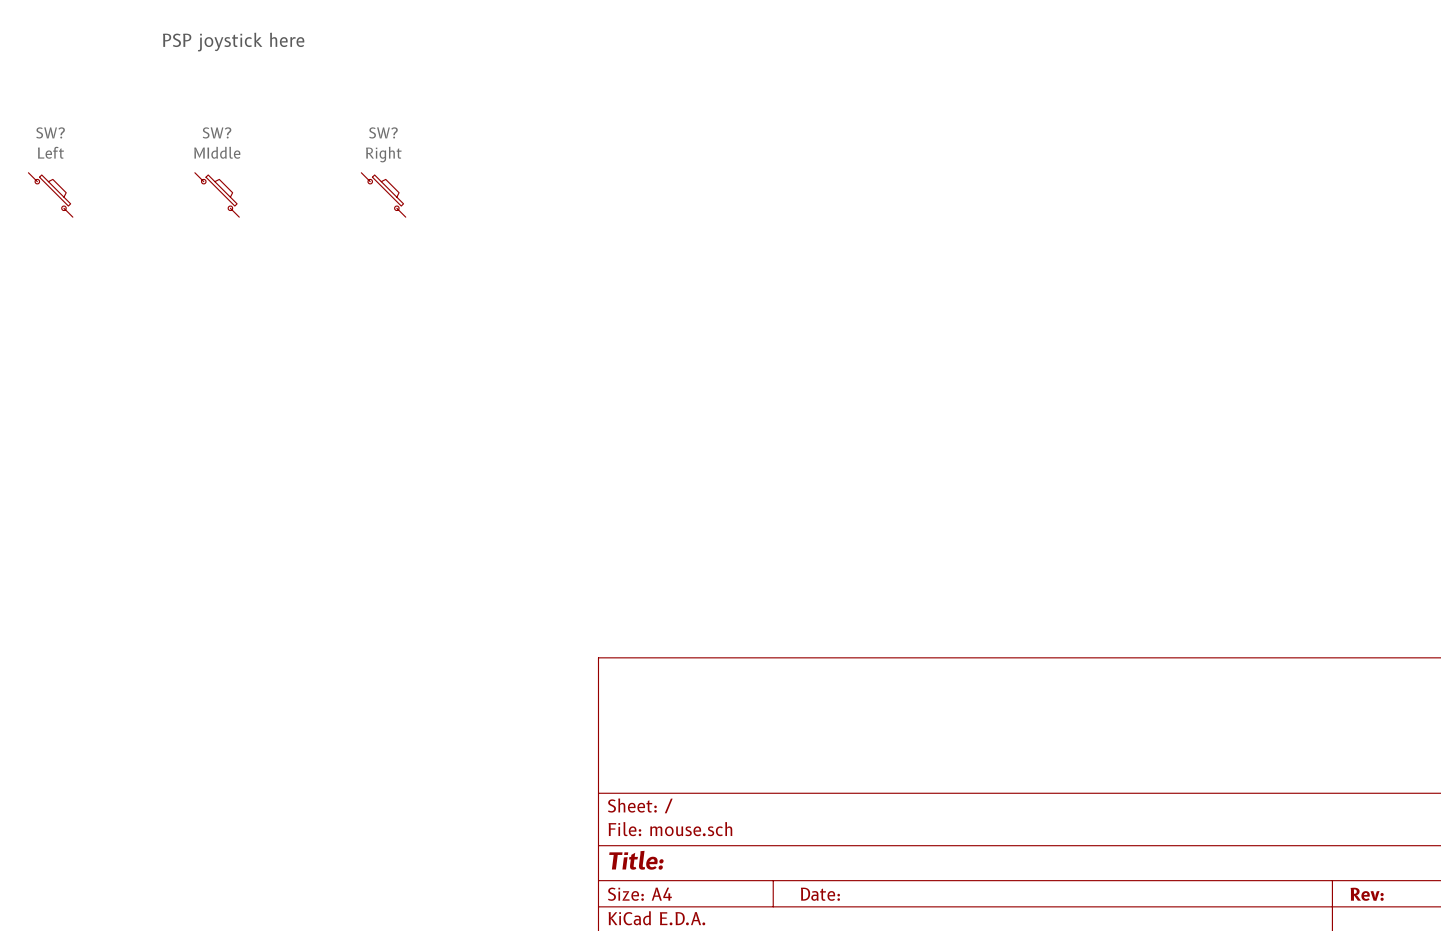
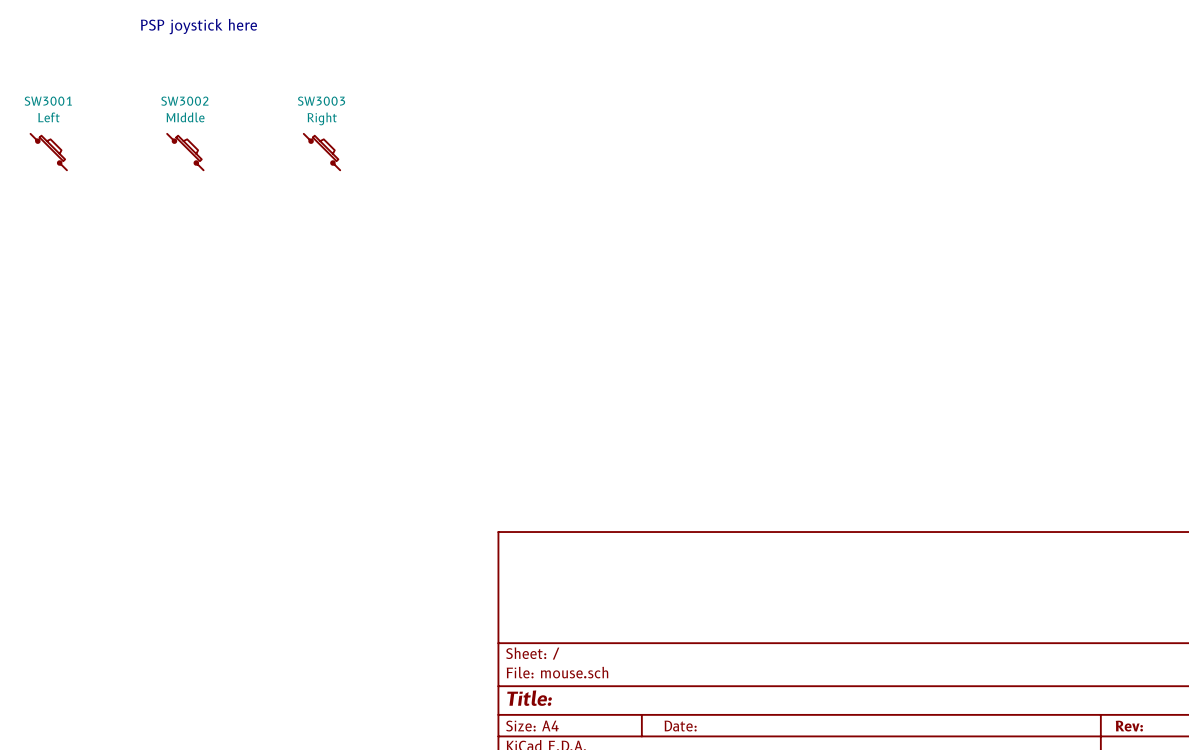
SW? name: SW? (50, 132) -> SW3001 (48, 101)
SW? name: SW? (217, 132) -> SW3002 (184, 101)
SW? name: SW? (383, 132) -> SW3003 (321, 101)

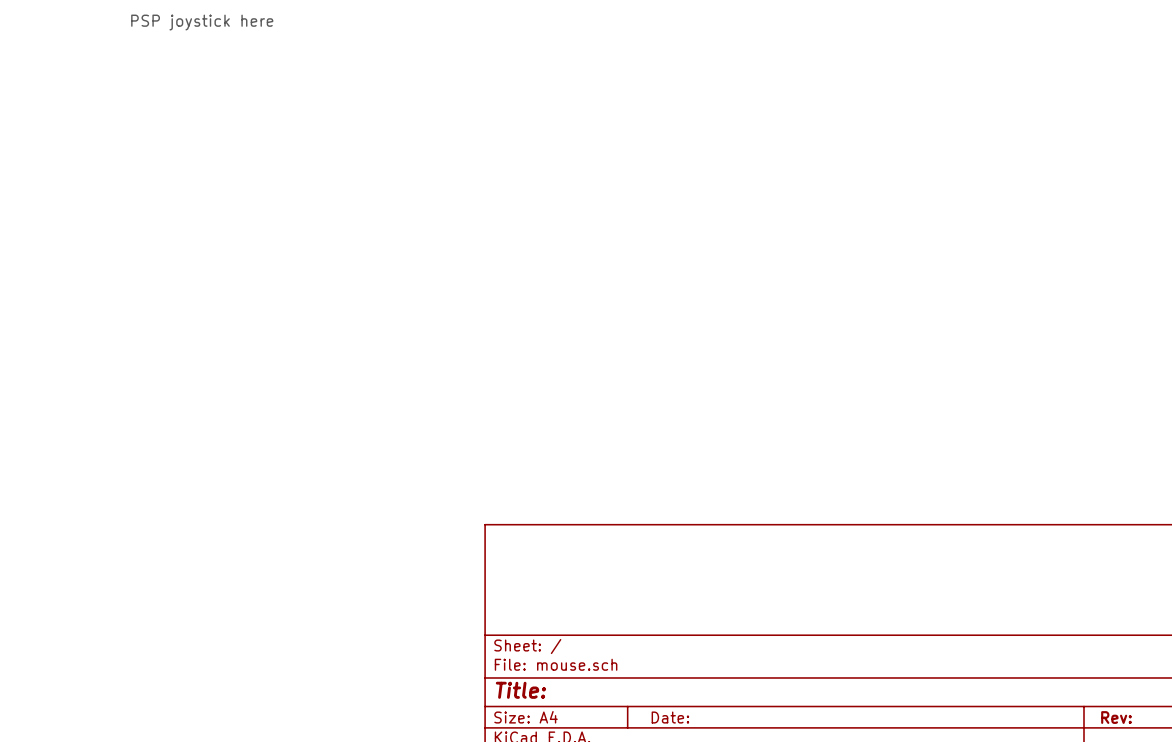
SW3001: Left (48, 152) -> none
SW3002: MIddle (185, 152) -> none
SW3003: Right (321, 152) -> none

